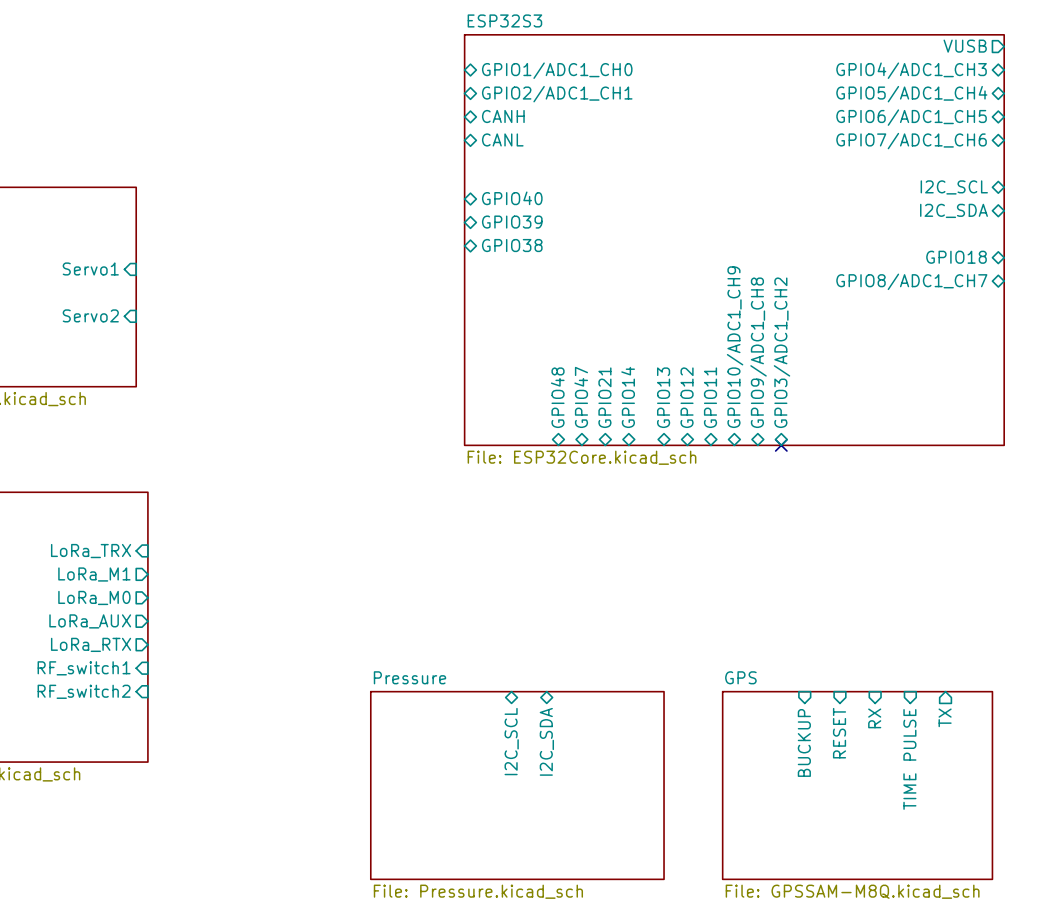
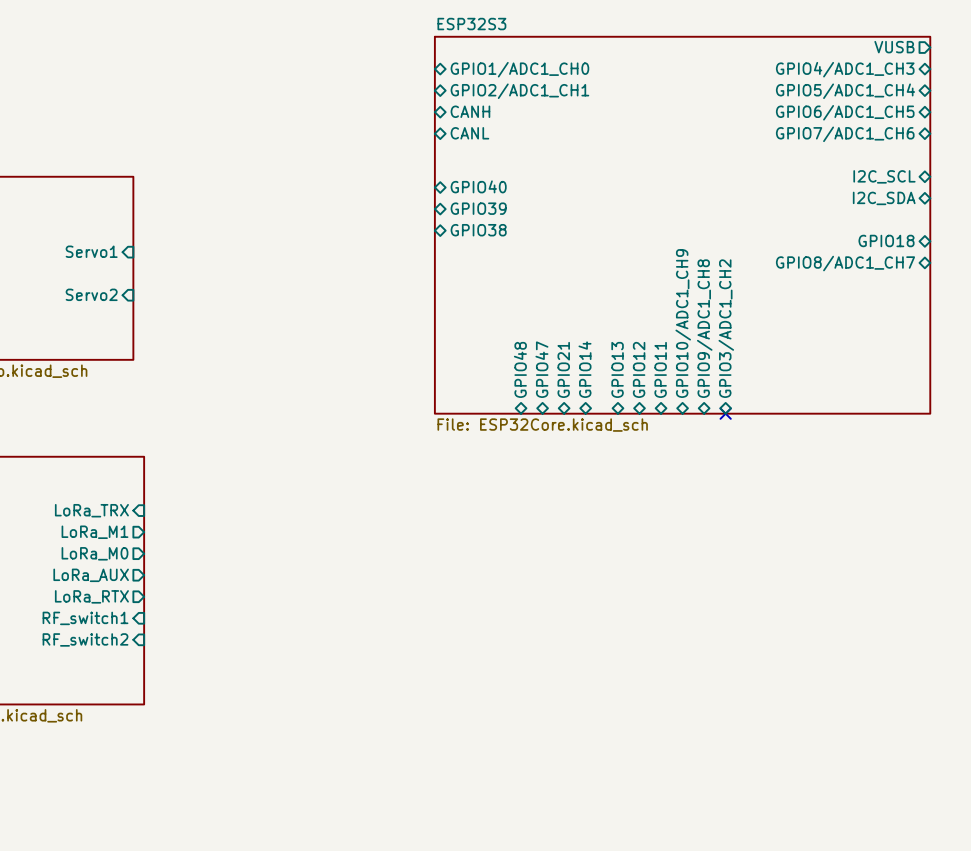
sheet pin: TX (945, 717) -> none
sheet pin: RX (874, 718) -> none
sheet pin: RESET (839, 733) -> none
sheet pin: I2C_SCL (511, 741) -> none
sheet pin: I2C_SDA (546, 741) -> none
sheet pin: BUCKUP (804, 742) -> none
sheet pin: TIME PULSE (909, 759) -> none
sheet Pressure: File: Pressure.kicad_sch (517, 785) -> none
sheet GPS: File: GPSSAM-M8Q.kicad_sch (857, 785) -> none

